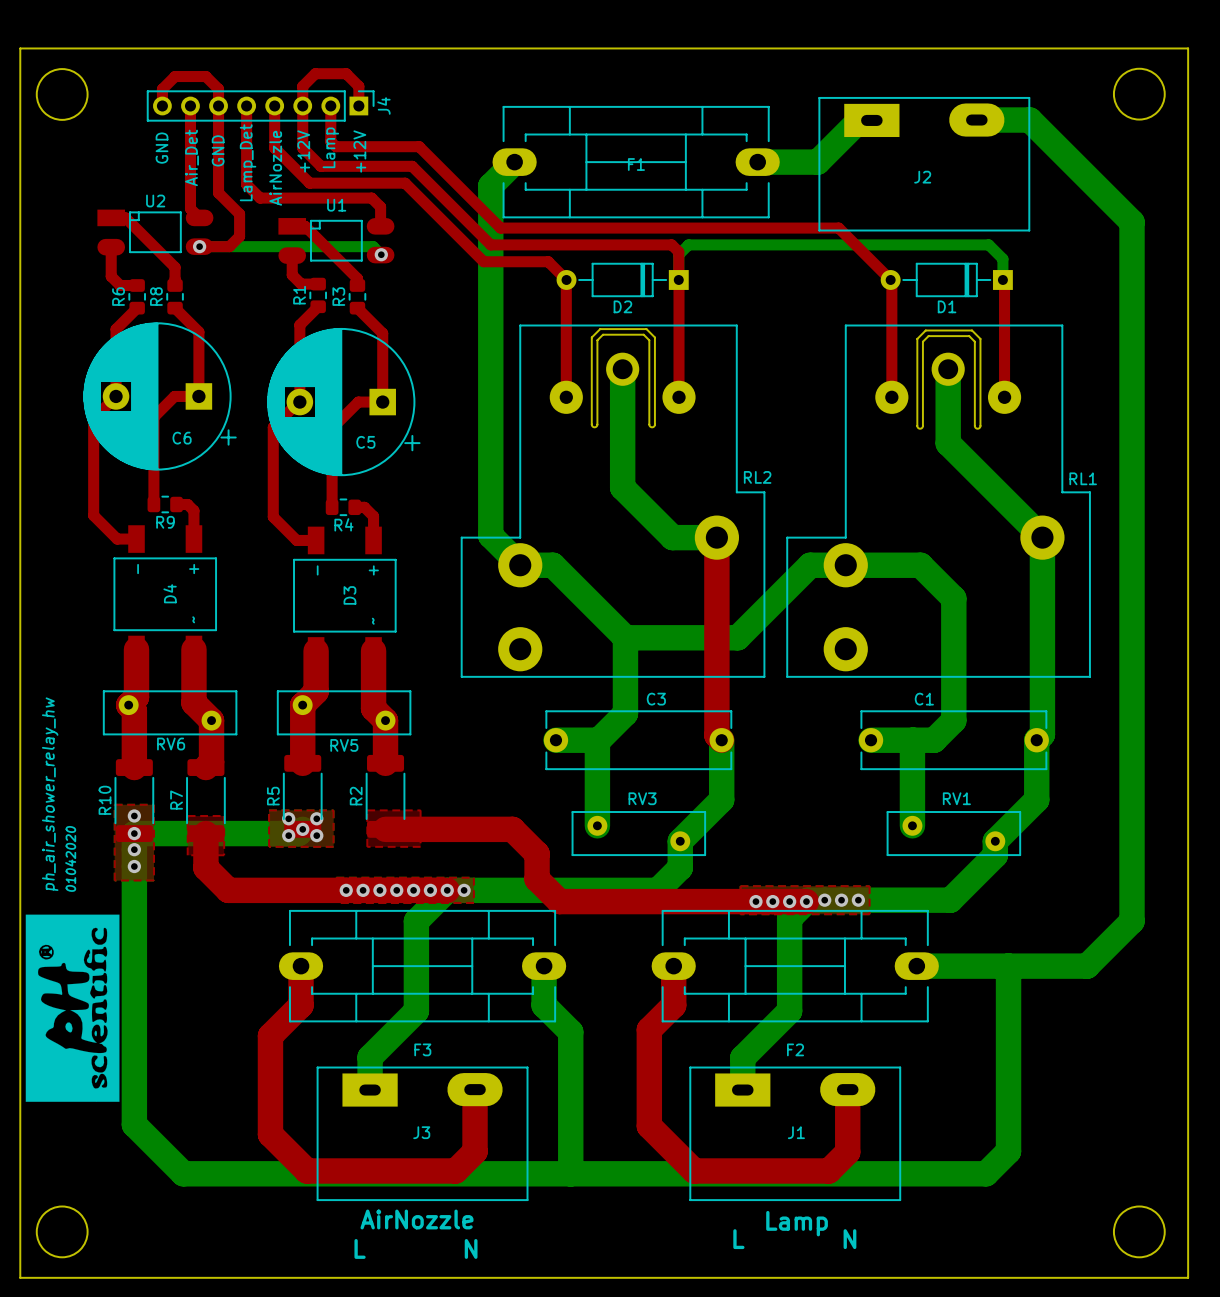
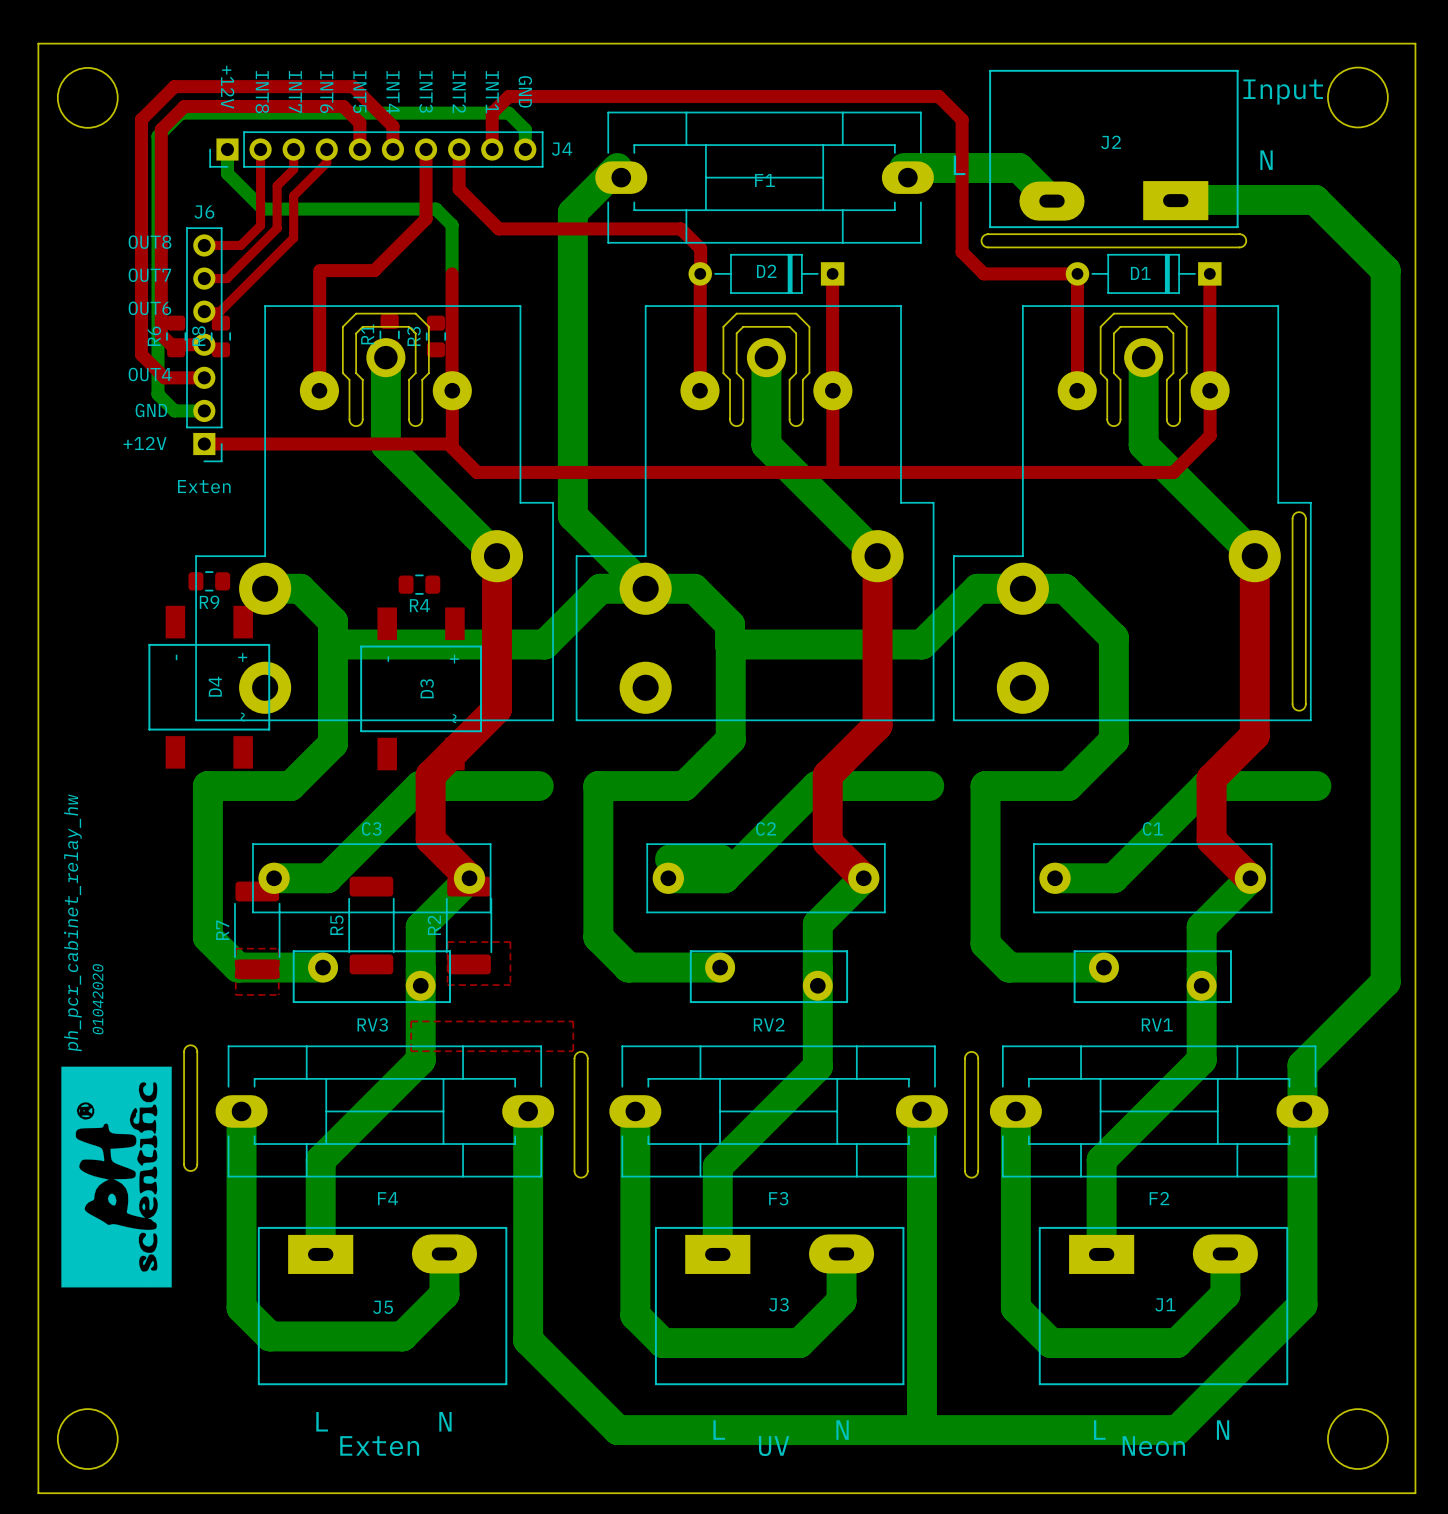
text: none -> +12V (227, 87)
text: none -> INT8 (262, 92)
text: none -> INT7 (295, 92)
text: none -> INT6 (326, 92)
text: none -> INT5 (359, 92)
text: none -> INT4 (392, 92)
text: none -> INT3 (426, 91)
text: none -> INT2 (459, 92)
text: none -> INT1 (492, 92)
text: none -> GND (525, 91)
text: none -> Input (1283, 92)
J4 footprint: [147, 90, 375, 122] -> [209, 131, 544, 168]
top track: (162, 105) (162, 89) (175, 76) (205, 76) (218, 89) (218, 192) (239, 214) (239, 236) (229, 246) (199, 246) -> none
top track: (190, 105) (190, 208) (199, 217) -> none
top track: (246, 105) (246, 184) (260, 198) (371, 198) (380, 206) (380, 226) -> none
top track: (274, 105) (274, 148) (309, 183) (405, 183) (483, 261) (548, 261) (566, 279) (566, 397) -> none
top track: (330, 105) (330, 141) (335, 146) (419, 146) (500, 228) (838, 228) (891, 281) (891, 397) -> none
top track: (358, 105) (358, 86) (346, 73) (315, 73) (302, 86) (302, 148) (320, 166) (412, 166) (490, 244) (671, 244) (678, 251) (679, 397) -> none
J4 name position: J4 (383, 105) -> J4 (562, 149)
bottom track: (871, 120) (859, 120) (817, 162) (757, 162) -> none
bottom track: (976, 120) (1029, 120) (1132, 222) (1132, 921) (1087, 966) (916, 966) -> none
bottom track: none -> (227, 149) (227, 173) (262, 209) (435, 209) (452, 225) (452, 270)
top track: none -> (260, 149) (260, 225) (240, 245) (204, 245)
top track: none -> (293, 149) (293, 169) (277, 185) (277, 228) (226, 278) (204, 278)
top track: none -> (326, 149) (326, 162) (293, 195) (293, 237) (219, 311) (204, 311)
top track: none -> (359, 149) (359, 123) (343, 106) (184, 106) (161, 129) (161, 334) (171, 344) (204, 344)
top track: none -> (392, 149) (392, 126) (353, 86) (174, 86) (141, 119) (141, 354) (164, 377) (204, 377)
top track: none -> (426, 149) (426, 219) (374, 270) (319, 270)
top track: none -> (459, 149) (459, 189) (498, 228) (680, 228) (700, 248) (700, 390)
top track: none -> (492, 149) (492, 113) (508, 96) (938, 96) (962, 119) (962, 252) (983, 273) (1077, 273) (1077, 390)
bottom track: none -> (525, 149) (525, 129) (508, 113) (181, 113) (158, 136) (158, 394) (174, 410) (204, 410)
text: Lamp (330, 147) -> none
text: none -> N (1266, 160)
text: GND (162, 148) -> none
text: GND (218, 150) -> none
text: +12V (303, 151) -> none
text: +12V (359, 151) -> none
text: none -> L (959, 165)
bottom track: none -> (617, 168) (572, 212) (572, 515) (645, 588)
bottom track: none -> (904, 168) (1018, 168) (1051, 201)
text: Air_Det (192, 157) -> none
text: Lamp_Det (248, 162) -> none
bottom track: (514, 162) (490, 185) (490, 535) (520, 565) (552, 565) (625, 637) -> none
J2 rotation: 0° (924, 164) -> 180° (1113, 148)
text: AirNozzle (275, 168) -> none
bottom track: none -> (1175, 200) (1315, 199) (1385, 270) (1385, 982) (1302, 1065) (1302, 1304) (1177, 1430) (617, 1430) (528, 1340) (528, 1115)
board edge: none -> (988, 234) (1239, 234) (1244, 236) (1246, 240) (1244, 245) (1239, 247) (988, 247) (983, 245) (981, 240) (983, 236) (988, 234)
text: none -> OUT8 (150, 242)
top track: (111, 217) (125, 217) (175, 267) (175, 285) -> none
top track: (292, 226) (305, 226) (357, 278) (357, 285) -> none
U2: (155, 232) -> none
U1: (336, 240) -> none
top track: none -> (319, 273) (319, 390)
top track: none -> (452, 273) (452, 390)
top track: none -> (832, 273) (832, 390)
top track: none -> (1209, 273) (1210, 435) (1173, 472) (477, 472) (448, 444) (204, 444)
text: none -> OUT7 (149, 275)
bottom track: (199, 246) (373, 246) (381, 254) -> none
via: (199, 246) -> none
top track: (111, 247) (111, 276) (120, 285) (137, 285) -> none
via: (381, 254) -> none
top track: (292, 255) (292, 275) (301, 284) (318, 284) -> none
text: none -> OUT6 (149, 308)
board edge: none -> (356, 313) (342, 326) (342, 373) (349, 379) (350, 422) (357, 425) (362, 419) (362, 379) (356, 373) (356, 333) (362, 326) (409, 326) (415, 333) (415, 373) (409, 379) (409, 420) (412, 425) (418, 425) (422, 420) (422, 379) (428, 373) (428, 326) (415, 313) (356, 313)
board edge: none -> (736, 313) (796, 313) (809, 326) (809, 373) (802, 379) (802, 420) (799, 425) (792, 425) (789, 420) (789, 379) (796, 373) (796, 333) (789, 326) (743, 326) (736, 333) (736, 373) (743, 379) (743, 419) (738, 425) (730, 422) (730, 379) (723, 373) (723, 326) (736, 313)
board edge: none -> (1113, 313) (1173, 313) (1186, 326) (1186, 373) (1180, 379) (1180, 420) (1176, 425) (1170, 425) (1166, 420) (1166, 379) (1173, 373) (1173, 333) (1166, 326) (1120, 326) (1113, 333) (1113, 373) (1120, 379) (1120, 419) (1115, 425) (1108, 422) (1107, 379) (1100, 373) (1100, 326) (1113, 313)
D2 position: (622, 279) -> (766, 273)
bottom track: (678, 279) (678, 254) (688, 244) (988, 244) (1002, 258) (1002, 279) -> none
D1 position: (946, 279) -> (1143, 273)
top track: (1002, 279) (1004, 281) (1004, 397) -> none
J6: none -> (204, 344)
top track: (318, 306) (299, 325) (299, 402) (273, 427) (273, 516) (296, 540) (316, 540) -> none
D2 name position: D2 (622, 306) -> D2 (766, 271)
D1 name position: D1 (947, 306) -> D1 (1140, 273)
top track: (137, 308) (116, 329) (116, 396) (93, 418) (93, 515) (117, 539) (136, 539) -> none
top track: (175, 308) (198, 332) (198, 396) (174, 396) (153, 417) (153, 504) -> none
top track: (357, 308) (382, 333) (382, 402) (358, 402) (332, 428) (332, 507) -> none
bottom track: none -> (385, 357) (385, 445) (497, 556)
bottom track: none -> (766, 357) (766, 445) (877, 556)
bottom track: none -> (1143, 357) (1143, 445) (1254, 556)
text: none -> OUT4 (150, 374)
board edge: (600, 329) (591, 337) (592, 425) (595, 427) (597, 424) (597, 340) (603, 334) (643, 334) (649, 340) (649, 424) (653, 426) (654, 337) (646, 329) (600, 329) -> none
board edge: (925, 330) (917, 338) (917, 427) (920, 428) (922, 425) (922, 341) (928, 336) (969, 336) (974, 341) (974, 425) (979, 428) (980, 338) (972, 330) (925, 330) -> none
top track: none -> (452, 390) (452, 447)
top track: none -> (832, 390) (832, 469) (835, 472)
text: none -> GND (151, 410)
bottom track: (622, 369) (622, 487) (672, 537) (716, 537) -> none
bottom track: (948, 369) (948, 443) (1042, 537) (1042, 734) (1036, 740) (1036, 799) (995, 841) (995, 855) (950, 900) (807, 900) (789, 918) (789, 1011) (742, 1057) (742, 1090) -> none
text: none -> +12V (145, 443)
C6: (160, 396) -> none
C5: (343, 402) -> none
text: none -> Exten (204, 486)
part: none -> (374, 513)
part: none -> (755, 513)
part: none -> (1132, 513)
board edge: none -> (1292, 518) (1292, 704) (1294, 708) (1299, 710) (1303, 708) (1305, 704) (1305, 518) (1303, 514) (1299, 512) (1294, 514) (1292, 518)
top track: none -> (497, 556) (497, 708) (430, 775) (430, 839) (469, 878)
top track: none -> (877, 556) (877, 725) (827, 775) (827, 842) (863, 878)
top track: none -> (1254, 556) (1254, 735) (1211, 778) (1211, 840) (1250, 878)
RL2: (613, 501) -> none
RL1: (938, 501) -> none
top track: (176, 504) (187, 504) (193, 510) (193, 539) -> none
top track: (354, 507) (364, 507) (373, 516) (373, 540) -> none
bottom track: none -> (265, 588) (300, 588) (332, 621) (332, 743) (290, 786) (207, 786) (207, 937) (238, 967) (323, 967)
top track: (716, 537) (716, 735) (721, 740) -> none
bottom track: none -> (730, 643) (730, 739) (684, 786) (598, 786) (598, 937) (628, 967) (720, 967)
bottom track: none -> (332, 644) (544, 644) (600, 588) (694, 588) (730, 624) (730, 644) (921, 644) (977, 588) (1064, 588) (1113, 637) (1113, 740) (1068, 786) (985, 786) (985, 943) (1009, 967) (1103, 967)
bottom track: (625, 637) (737, 637) (810, 565) (920, 565) (953, 598) (953, 720) (934, 740) (871, 740) -> none
bottom track: (625, 637) (625, 713) (597, 741) (597, 825) -> none
top track: (136, 649) (136, 697) (128, 705) (134, 710) (134, 767) -> none
top track: (193, 649) (193, 703) (211, 720) (211, 761) (205, 767) -> none
top track: (316, 650) (316, 691) (302, 705) -> none
top track: (373, 650) (373, 708) (385, 720) (385, 763) -> none
bottom track: none -> (538, 786) (419, 786) (327, 878) (274, 878)
bottom track: none -> (929, 786) (816, 786) (724, 878) (668, 878)
bottom track: none -> (1316, 786) (1205, 786) (1113, 878) (1055, 878)
C1 name position: C1 (924, 699) -> C1 (1152, 828)
top track: (302, 705) (302, 763) -> none
C3 footprint: [543, 710, 734, 770] -> [252, 843, 492, 914]
C1 footprint: [858, 710, 1049, 770] -> [1033, 843, 1273, 914]
RV6: (170, 712) -> none
RV5: (344, 712) -> none
bottom track: (721, 740) (721, 799) (680, 841) (680, 867) (657, 890) (447, 890) (416, 921) (416, 1011) (370, 1057) (370, 1090) -> none
bottom track: (913, 740) (912, 825) -> none
bottom track: none -> (469, 878) (420, 927) (420, 1060) (320, 1160) (320, 1254)
C2: none -> (766, 878)
bottom track: none -> (863, 878) (817, 924) (817, 1066) (717, 1166) (717, 1254)
bottom track: none -> (1250, 878) (1201, 927) (1201, 1060) (1101, 1160) (1101, 1254)
text: ph_air_shower_relay_hw (50, 794) -> ph_pcr_cabinet_relay_hw (72, 922)
RV3 name position: RV3 (642, 798) -> RV3 (372, 1024)
RV1 name position: RV1 (956, 798) -> RV1 (1157, 1024)
R10: (134, 800) -> none
top zone outline: (114, 804) (114, 880) (154, 880) (154, 804) (114, 804) -> none
top zone outline: (269, 810) (269, 846) (333, 846) (333, 810) (269, 810) -> none
RV3 footprint: [571, 811, 706, 856] -> [292, 950, 452, 1004]
RV1 footprint: [886, 811, 1022, 856] -> [1073, 950, 1232, 1004]
via: (134, 815) -> none
via: (288, 818) -> none
via: (316, 818) -> none
bottom track: (302, 829) (298, 833) (134, 833) (134, 1124) (183, 1173) (986, 1173) (1008, 1151) (1008, 966) -> none
via: (302, 829) -> none
top track: (385, 829) (512, 829) (537, 853) (537, 879) (559, 901) (806, 901) -> none
via: (134, 833) -> none
top track: (205, 833) (205, 867) (228, 890) (447, 890) -> none
via: (288, 835) -> none
via: (316, 835) -> none
RV2: none -> (768, 976)
via: (134, 849) -> none
via: (134, 866) -> none
top zone outline: (740, 886) (740, 914) (869, 914) (869, 886) (740, 886) -> none
via: (346, 890) -> none
via: (363, 890) -> none
via: (379, 890) -> none
via: (396, 890) -> none
via: (413, 890) -> none
via: (430, 890) -> none
via: (447, 890) -> none
via: (464, 890) -> none
via: (824, 900) -> none
via: (841, 900) -> none
via: (858, 900) -> none
via: (755, 901) -> none
via: (772, 901) -> none
via: (789, 901) -> none
via: (806, 901) -> none
board edge: none -> (184, 1051) (184, 1164) (185, 1169) (190, 1171) (195, 1169) (197, 1164) (197, 1051) (195, 1047) (190, 1045) (185, 1047) (184, 1051)
board edge: none -> (574, 1058) (574, 1171) (576, 1175) (581, 1177) (585, 1175) (587, 1171) (587, 1058) (585, 1053) (581, 1051) (576, 1053) (574, 1058)
board edge: none -> (964, 1058) (964, 1171) (966, 1175) (971, 1177) (976, 1175) (978, 1171) (978, 1058) (976, 1053) (971, 1051) (966, 1053) (964, 1058)
bottom track: none -> (241, 1111) (241, 1307) (270, 1336) (402, 1336) (444, 1294) (444, 1253)
F4: none -> (384, 1111)
bottom track: none -> (635, 1111) (635, 1315) (663, 1343) (799, 1343) (841, 1301) (841, 1253)
bottom track: none -> (921, 1111) (921, 1429)
bottom track: none -> (1015, 1111) (1015, 1307) (1051, 1343) (1176, 1343) (1225, 1294) (1225, 1253)
top track: (301, 966) (301, 1005) (270, 1035) (270, 1134) (306, 1170) (455, 1170) (475, 1151) (475, 1089) -> none
F3 position: (422, 966) -> (778, 1111)
bottom track: (544, 966) (544, 1005) (570, 1032) (570, 1173) -> none
top track: (673, 966) (673, 1005) (649, 1029) (649, 1126) (694, 1170) (828, 1170) (847, 1152) (847, 1089) -> none
F2 position: (795, 966) -> (1159, 1111)
drawing position: (72, 1008) -> (116, 1177)
F3 name position: F3 (422, 1049) -> F3 (778, 1198)
F2 name position: F2 (795, 1049) -> F2 (1159, 1198)
J5: none -> (382, 1306)
J3 position: (422, 1133) -> (779, 1306)
J1 position: (795, 1133) -> (1163, 1306)
text: AirNozzle (417, 1219) -> none
text: Lamp (797, 1223) -> none
text: none -> L (719, 1430)
text: none -> N (842, 1430)
text: none -> L (1099, 1430)
text: none -> N (1223, 1430)
text: none -> Exten (379, 1446)
text: none -> UV (774, 1446)
text: none -> Neon (1153, 1446)
text: L (738, 1239) -> none
text: N (849, 1239) -> none
text position: L (360, 1248) -> L (322, 1421)
text position: N (471, 1248) -> N (445, 1421)

